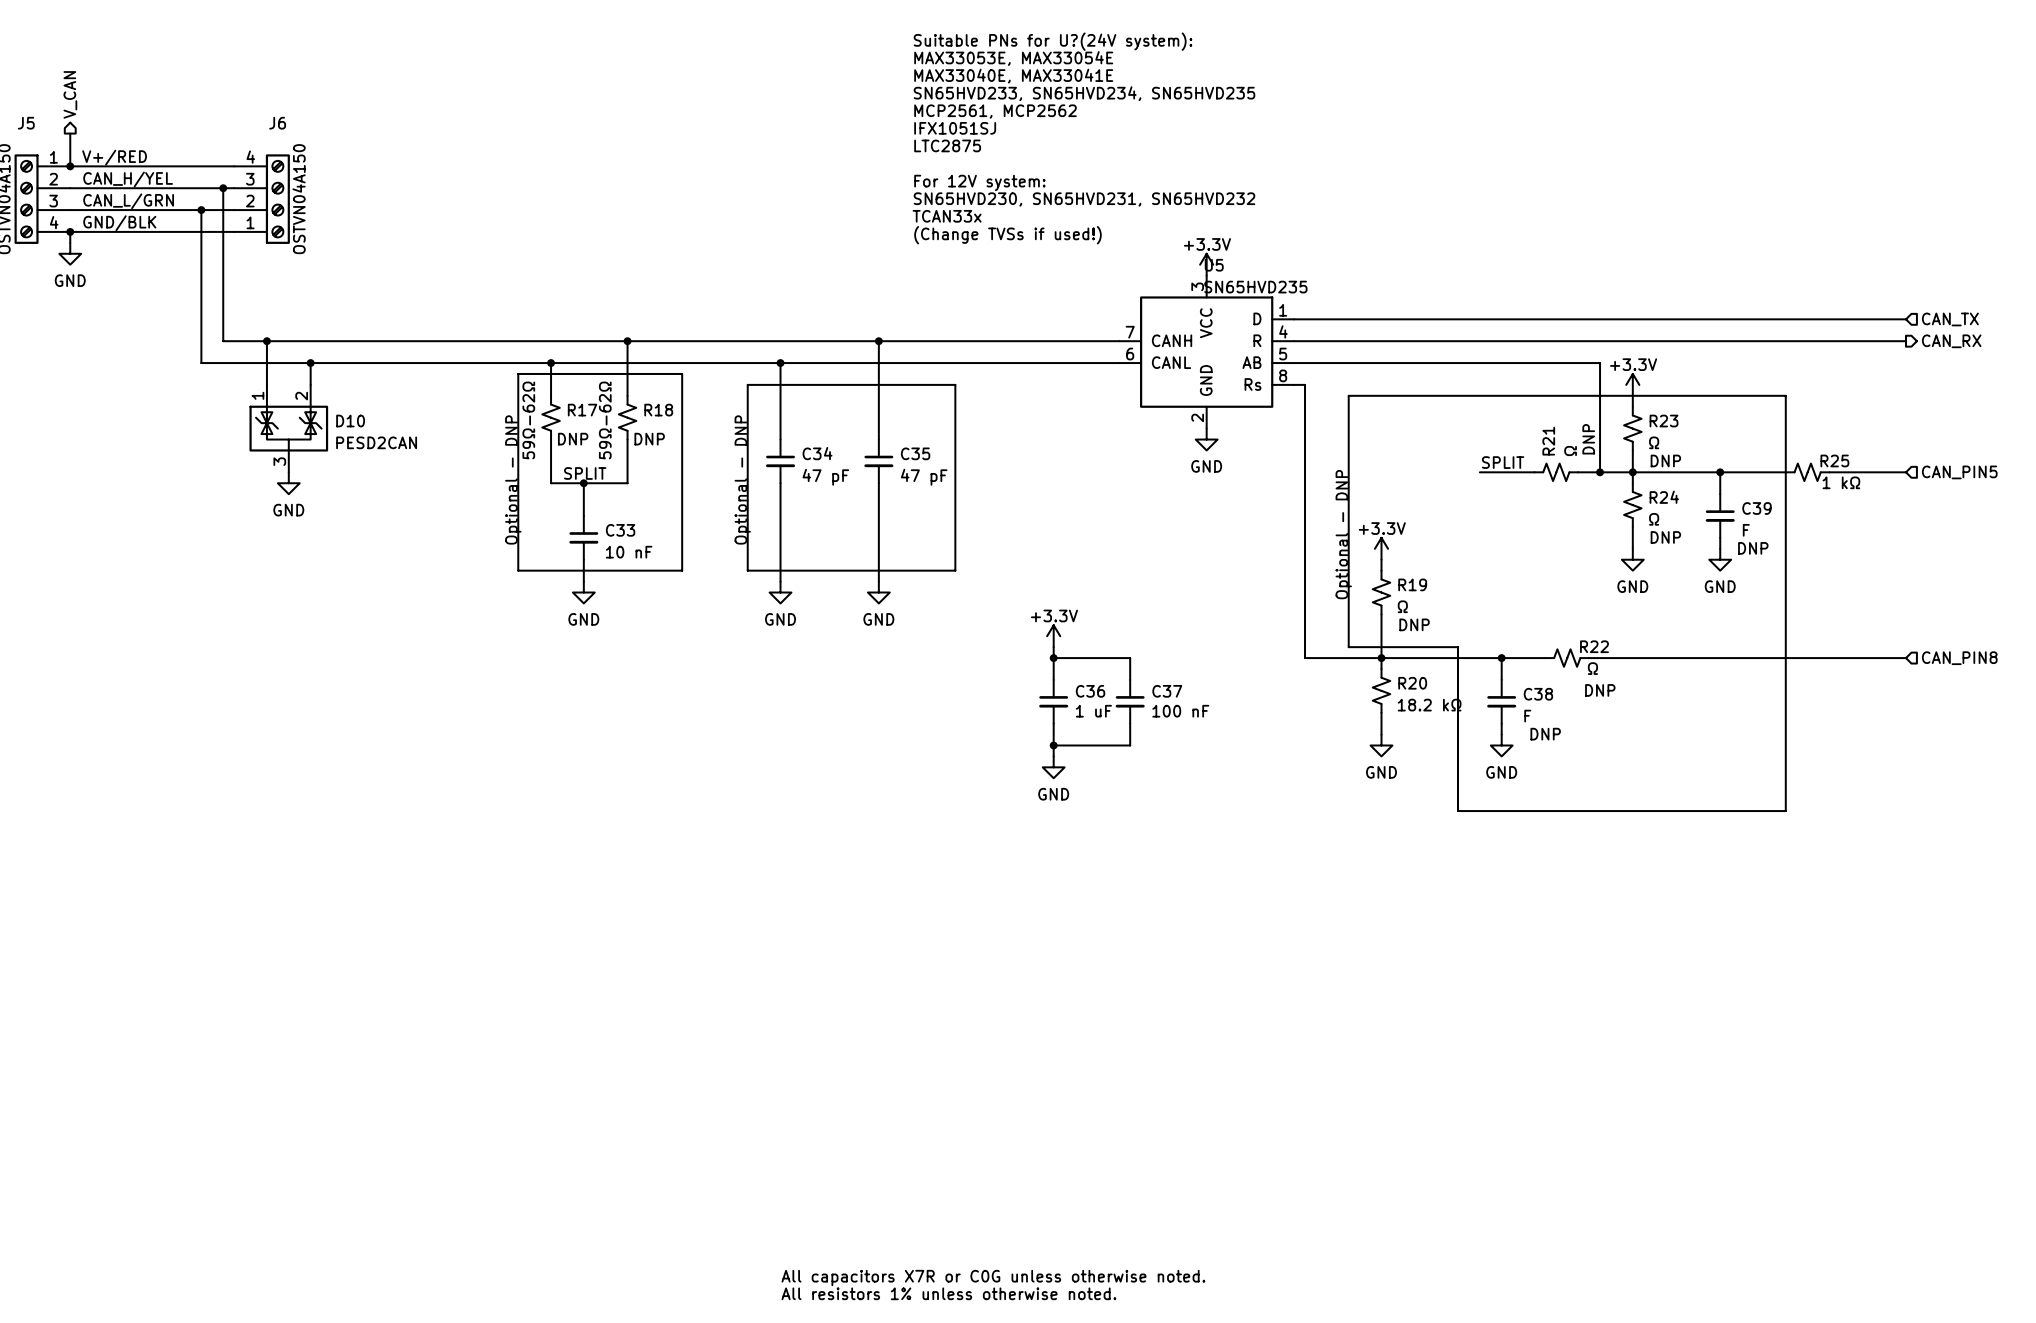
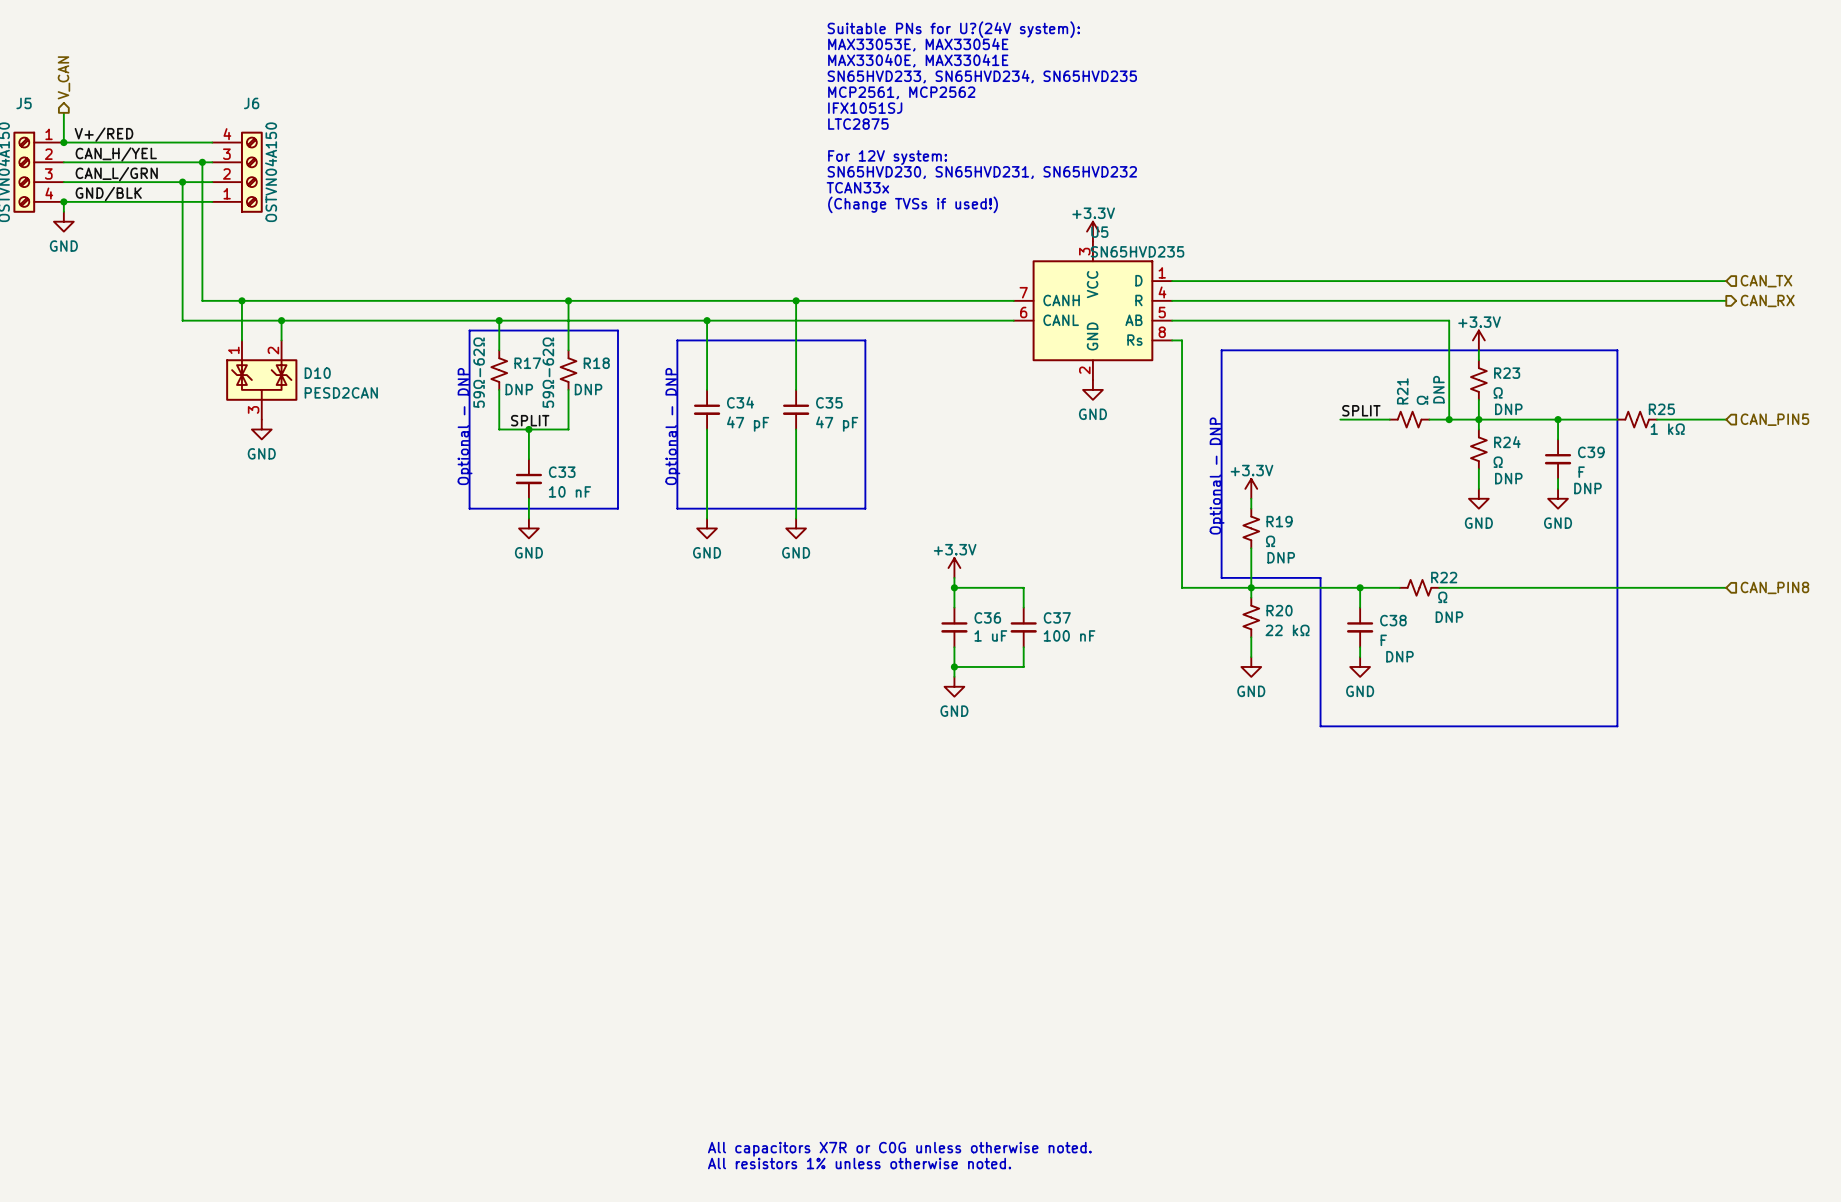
R20 value: 18.2 kΩ (1429, 705) -> 22 kΩ (1287, 630)

